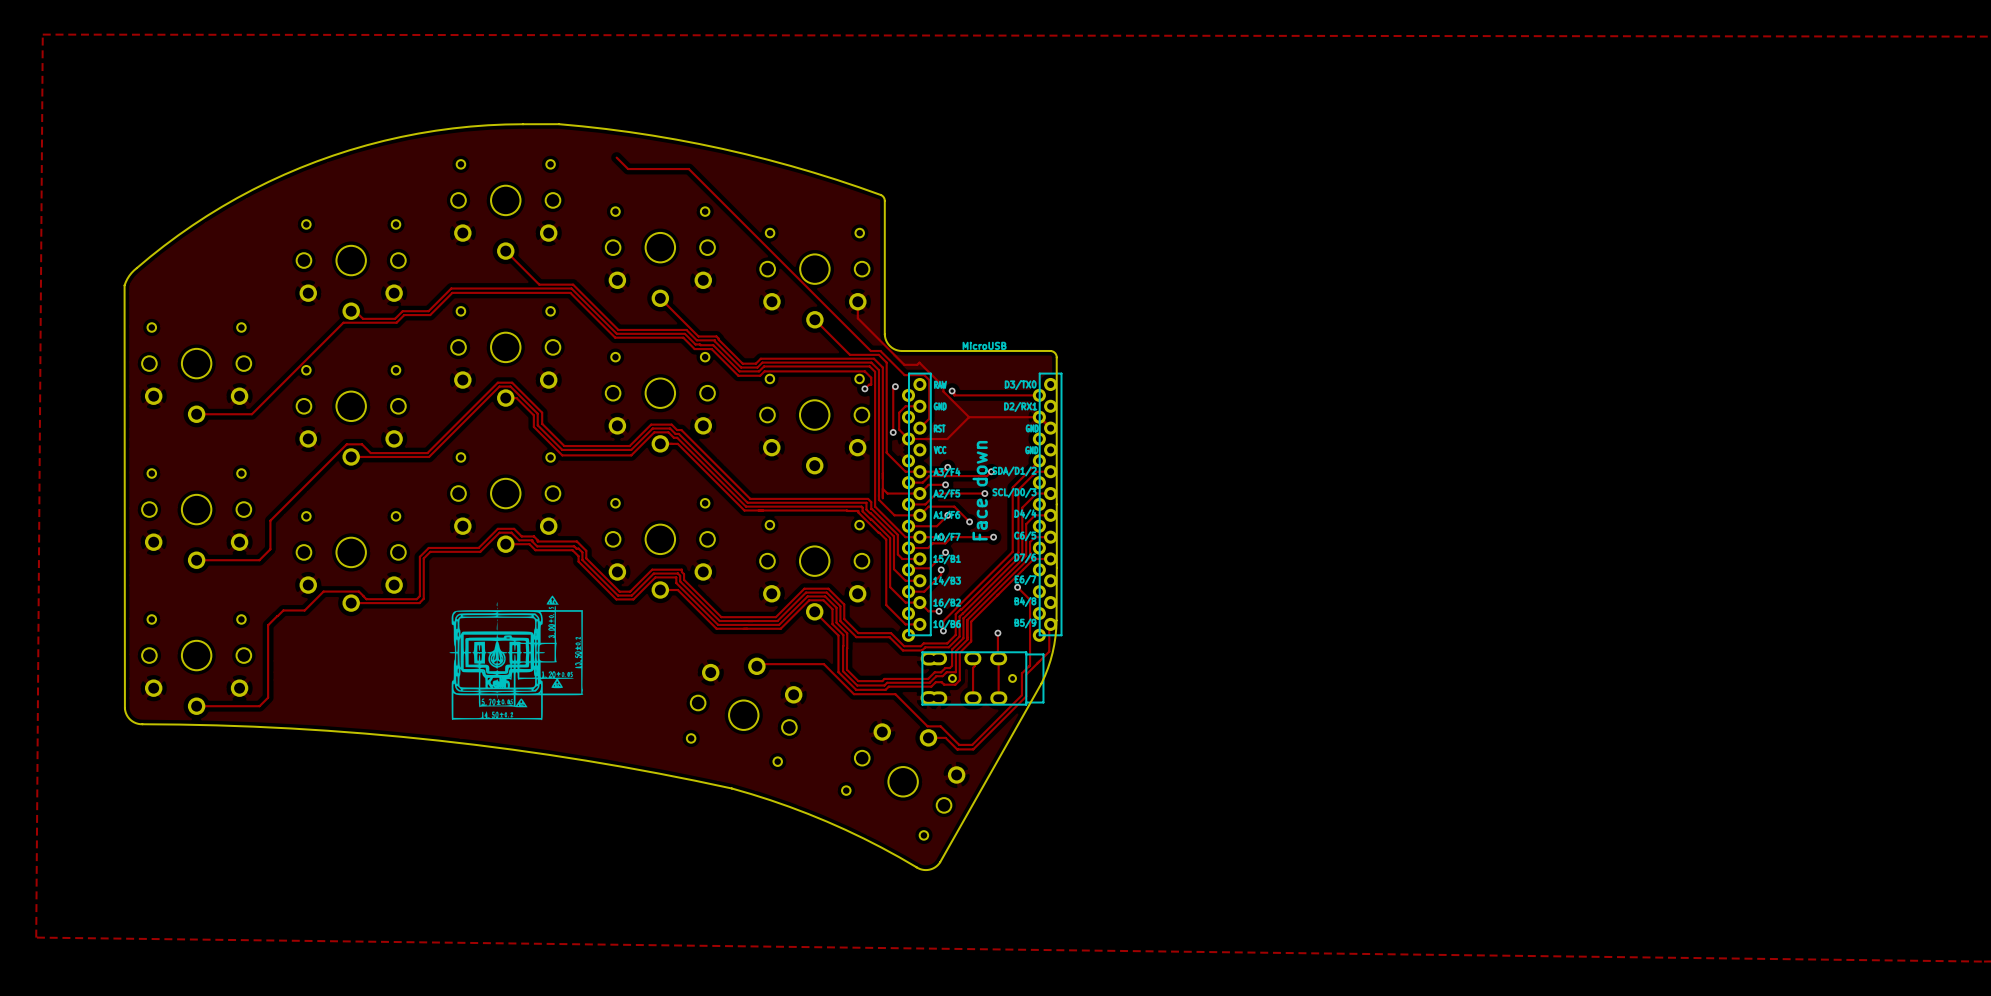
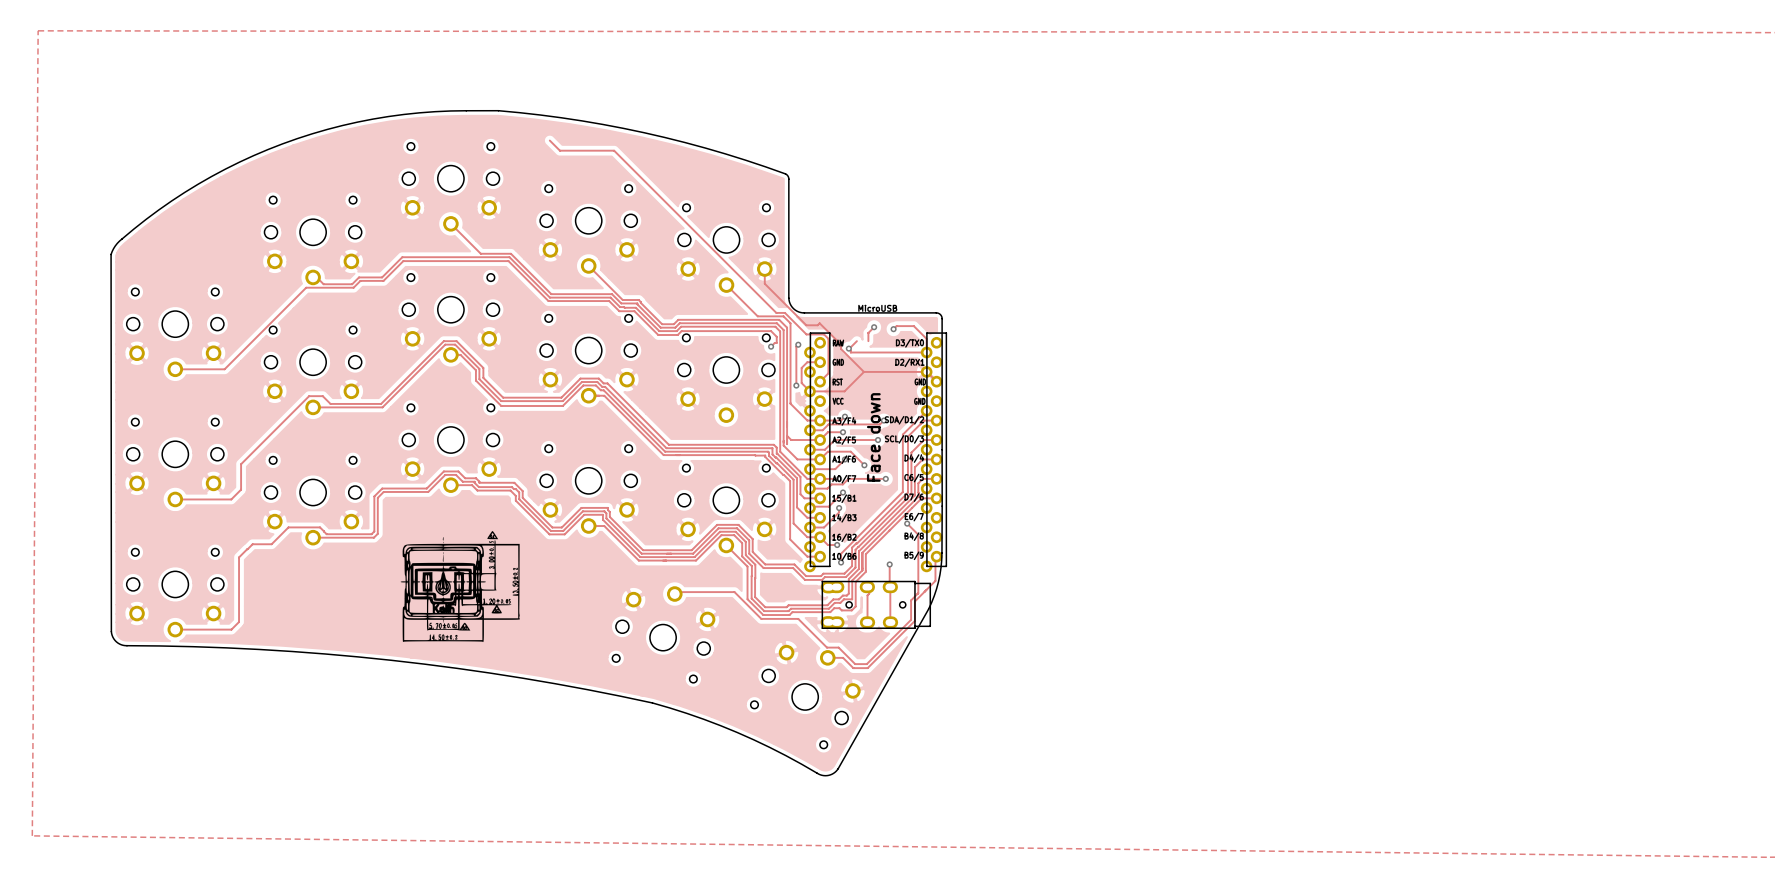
track: none -> (874, 327) (868, 333)
via: none -> (874, 327)
track: none -> (893, 329) (896, 326) (913, 326) (926, 338) (926, 352)
via: none -> (893, 329)
track: none -> (868, 333) (868, 341)
track: none -> (856, 341) (849, 348)

